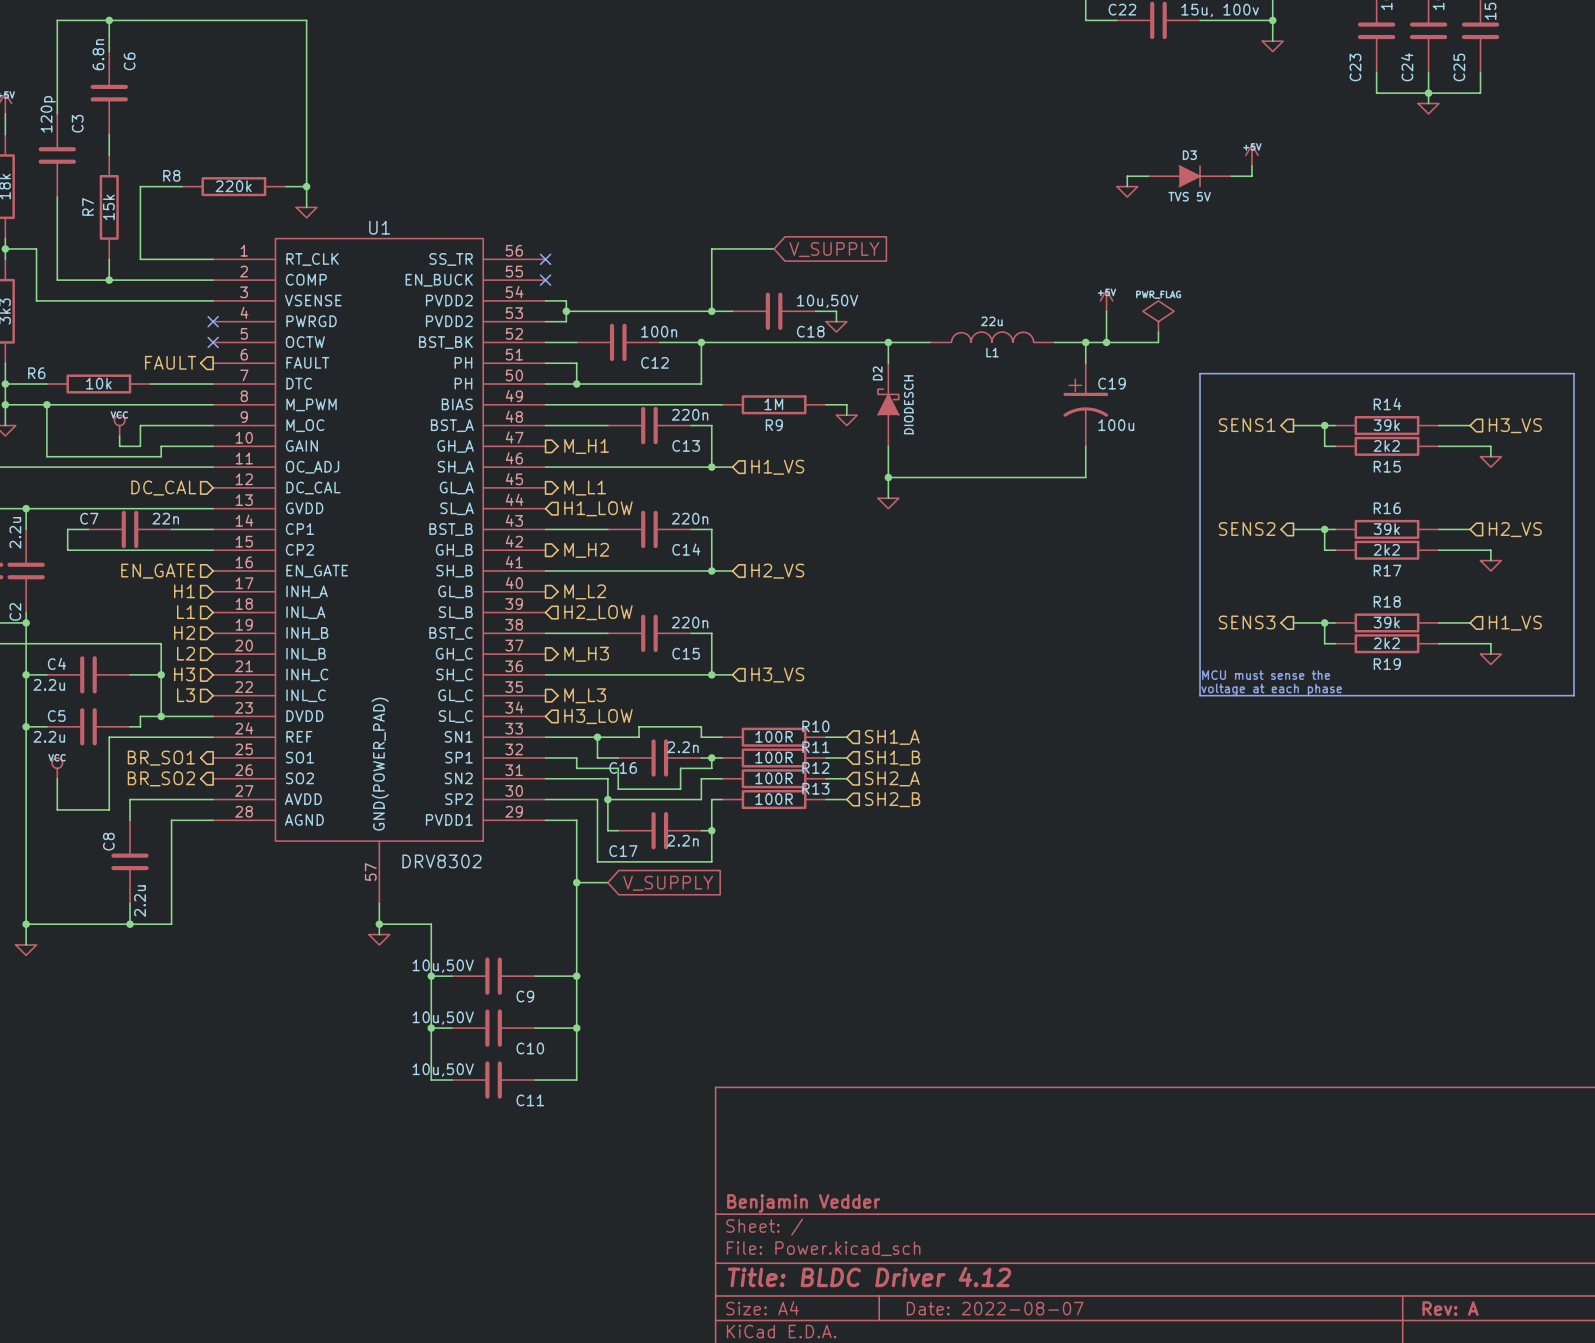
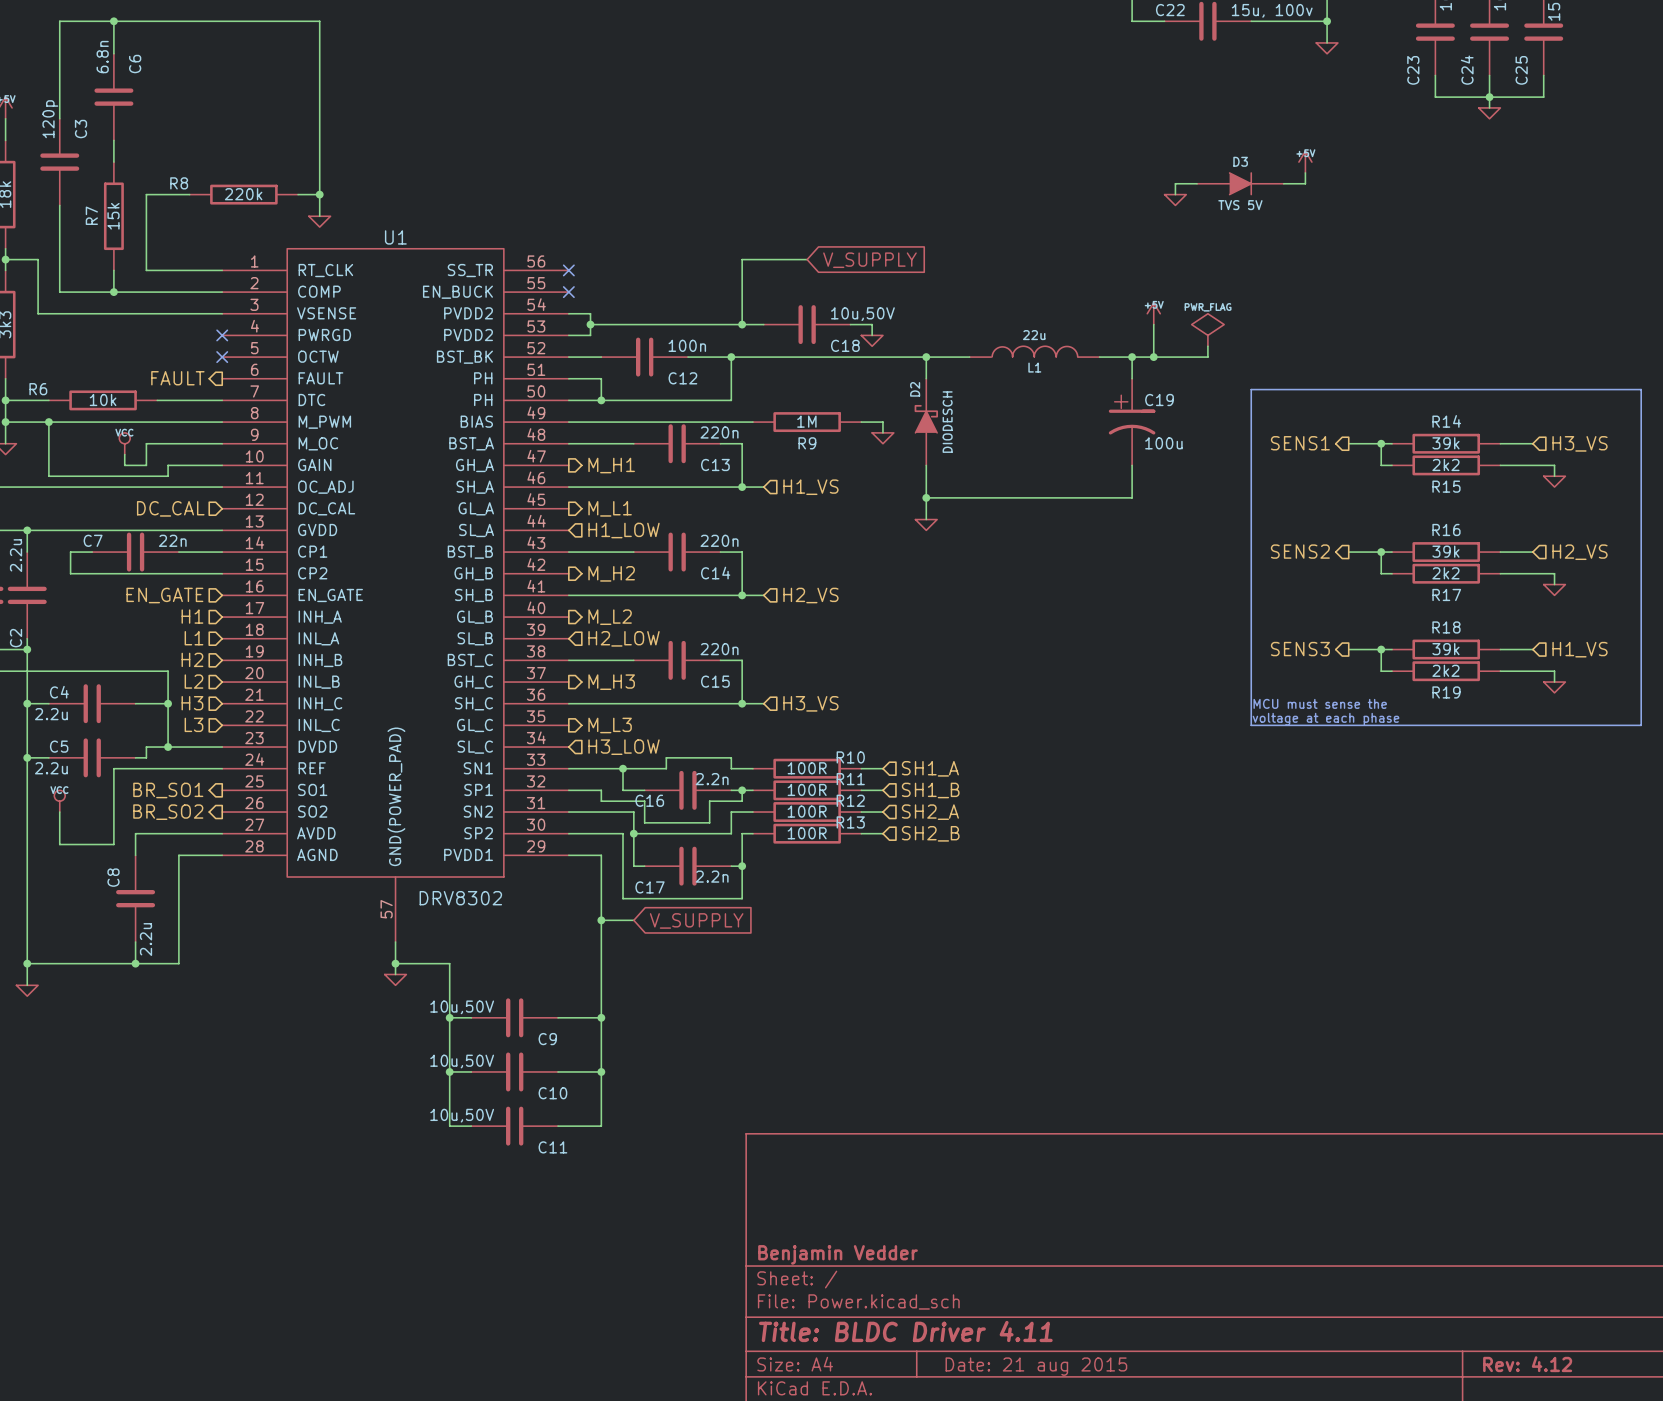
title block: Title: BLDC Driver 4.12 (869, 1276) -> Title: BLDC Driver 4.11 (905, 1331)
title block: Date: 2022-08-07 (995, 1308) -> Date: 21 aug 2015 (1036, 1366)
title block: Rev: A (1450, 1308) -> Rev: 4.12 (1527, 1364)

